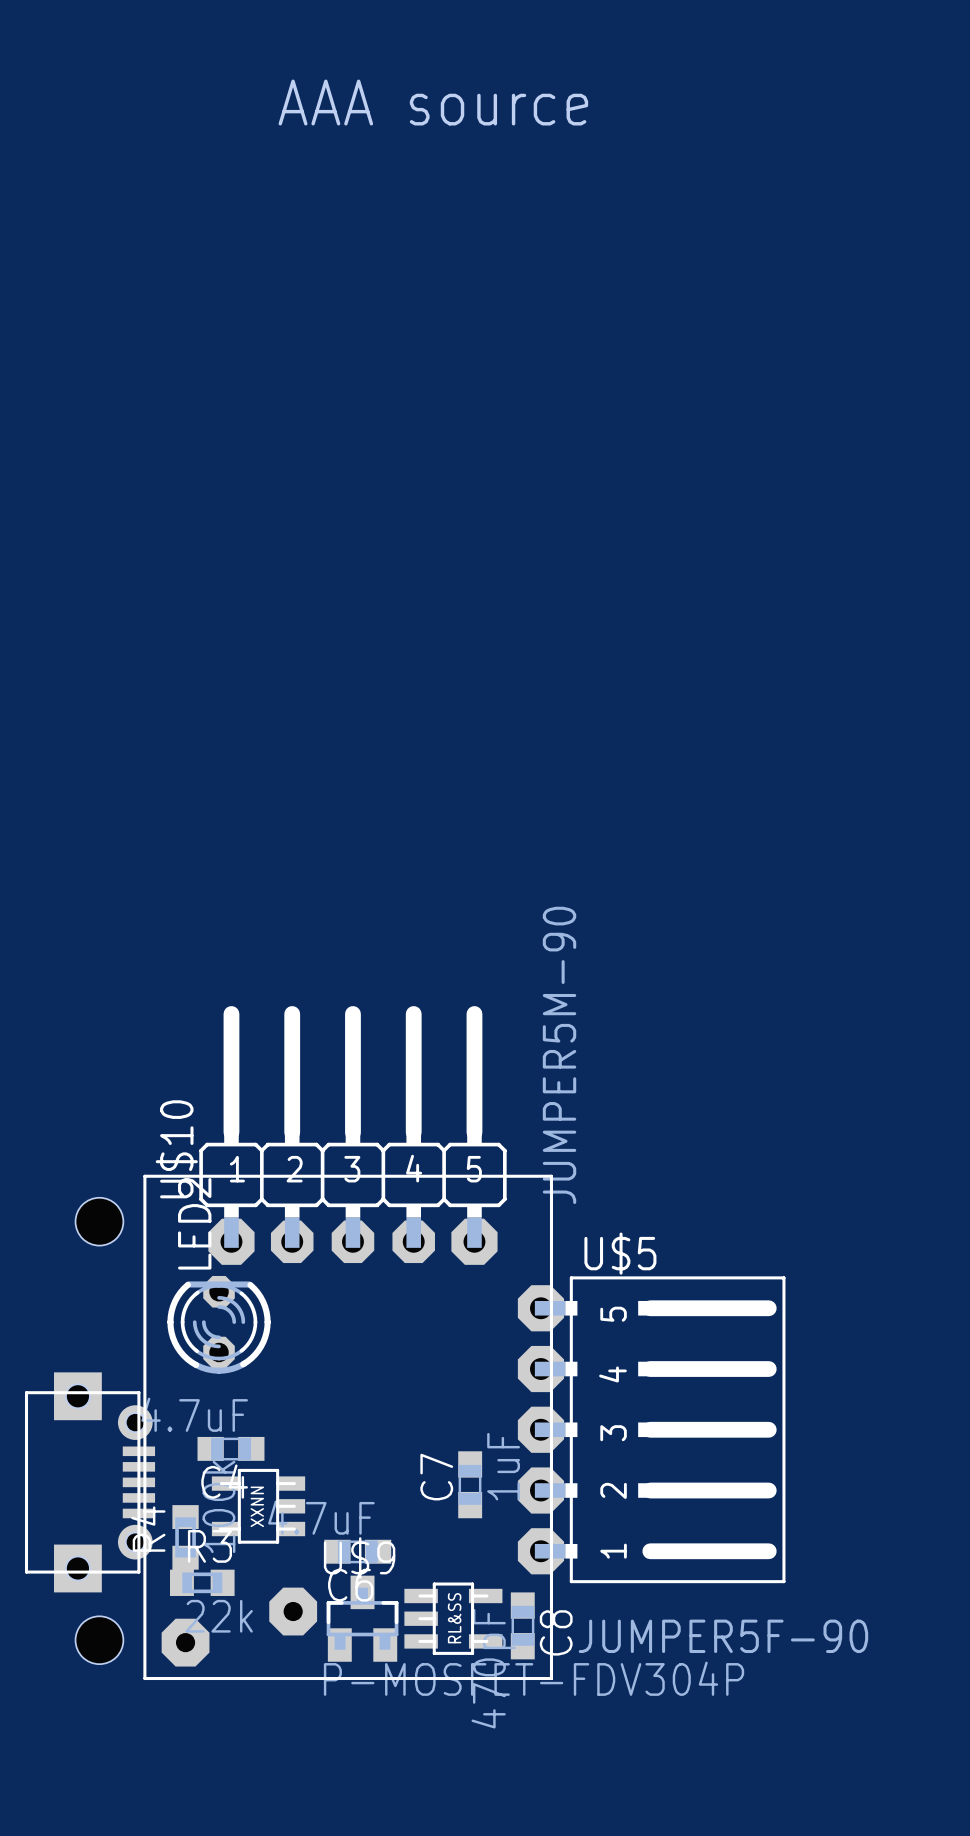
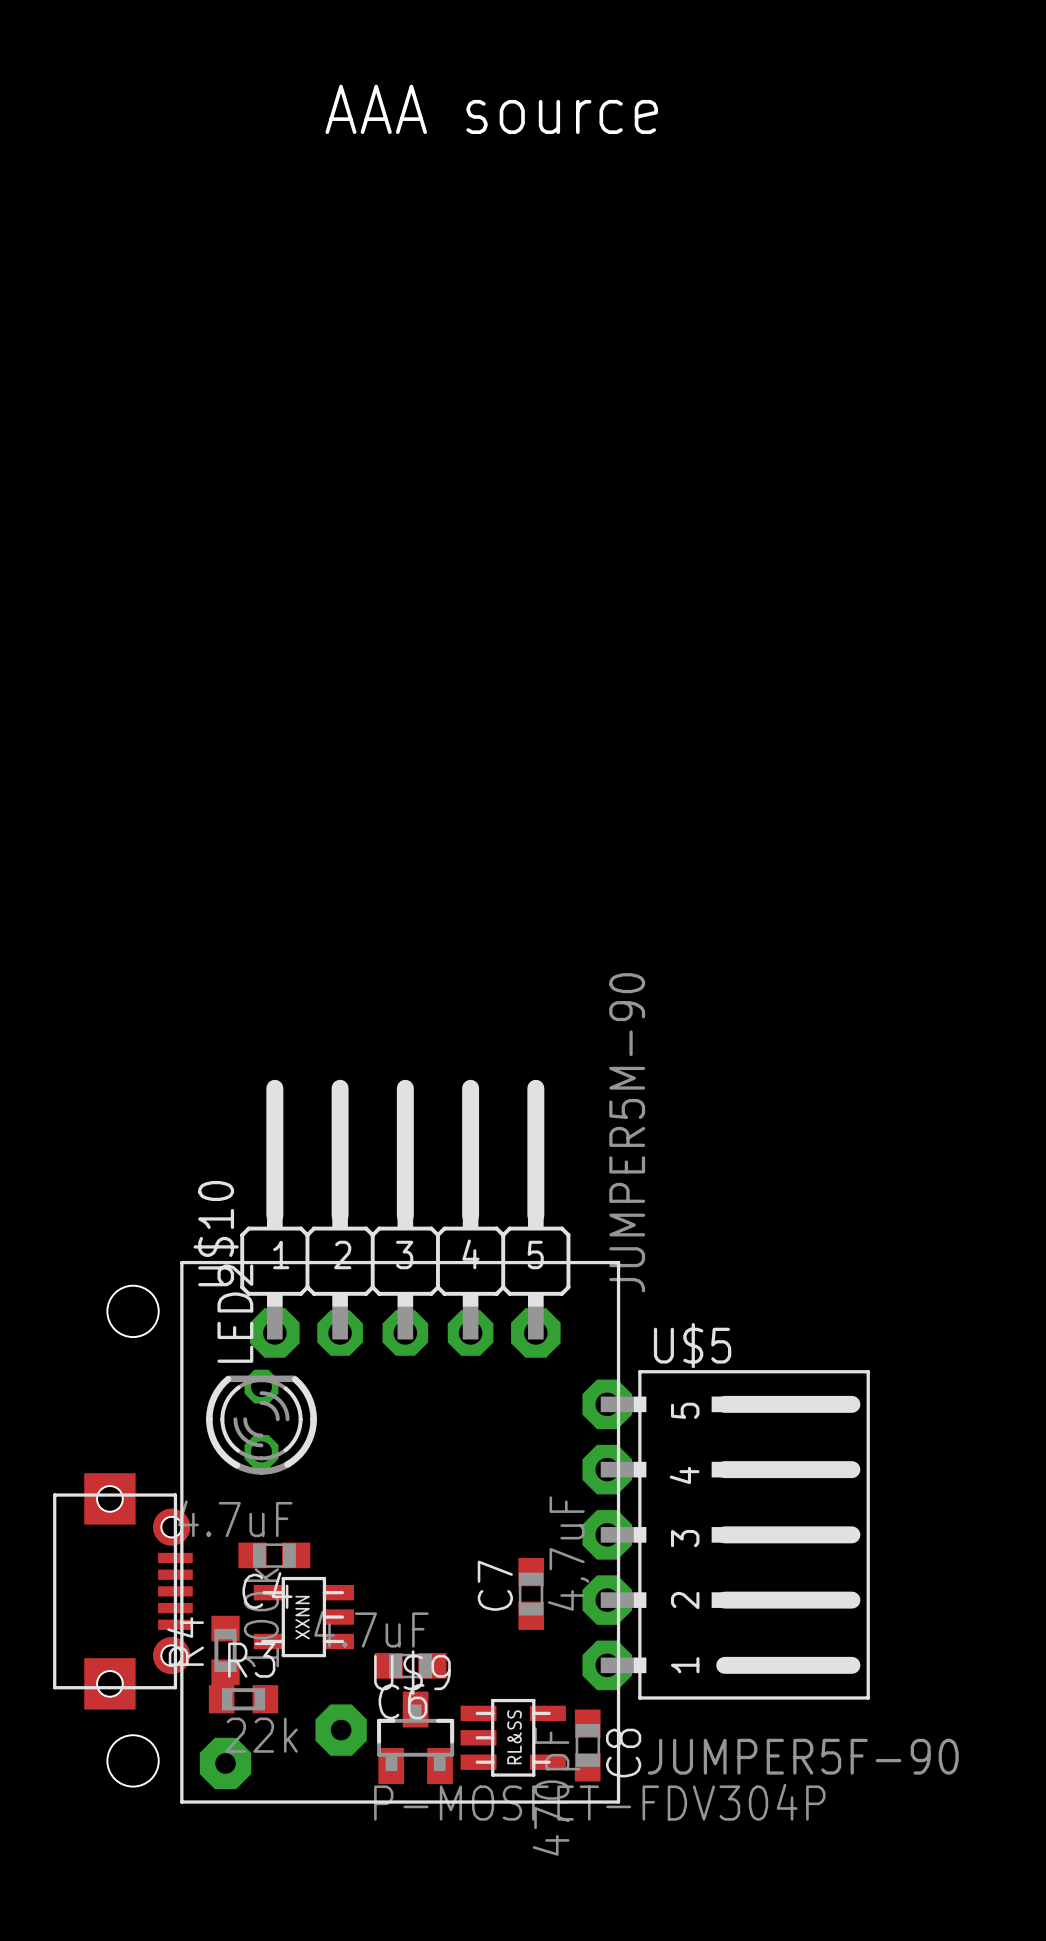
C7 value: 1uF (503, 1466) -> 4,7uF (568, 1553)

